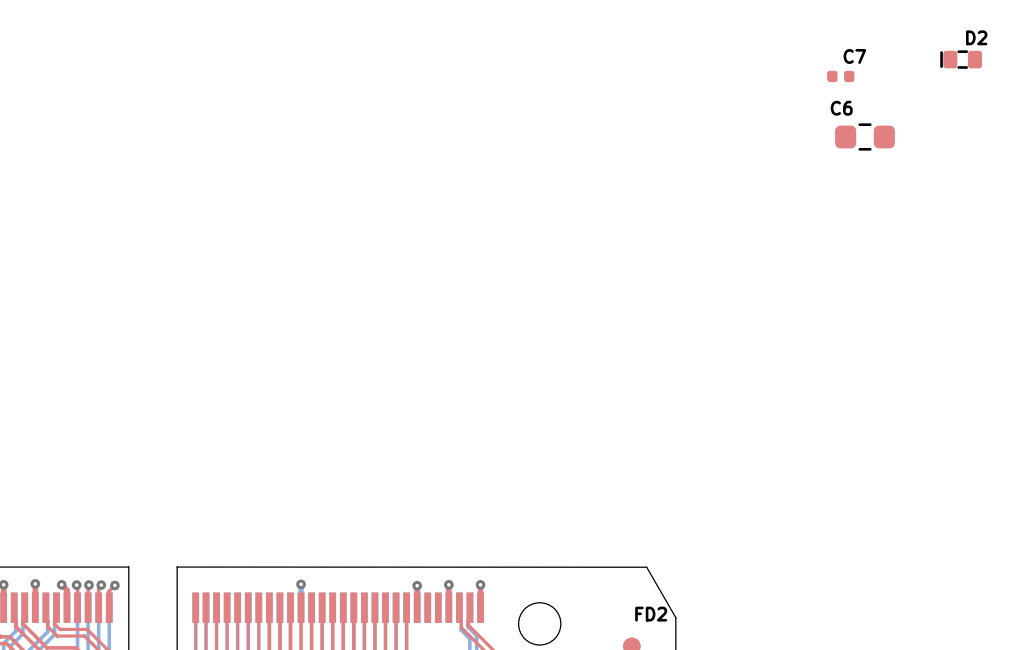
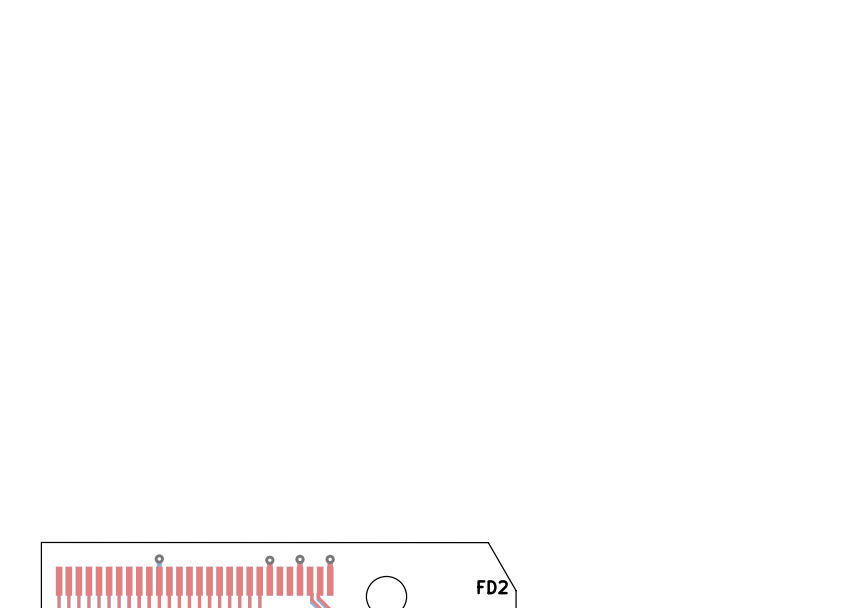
D2: (961, 59) -> none
C7: (840, 76) -> none
C6: (865, 136) -> none

